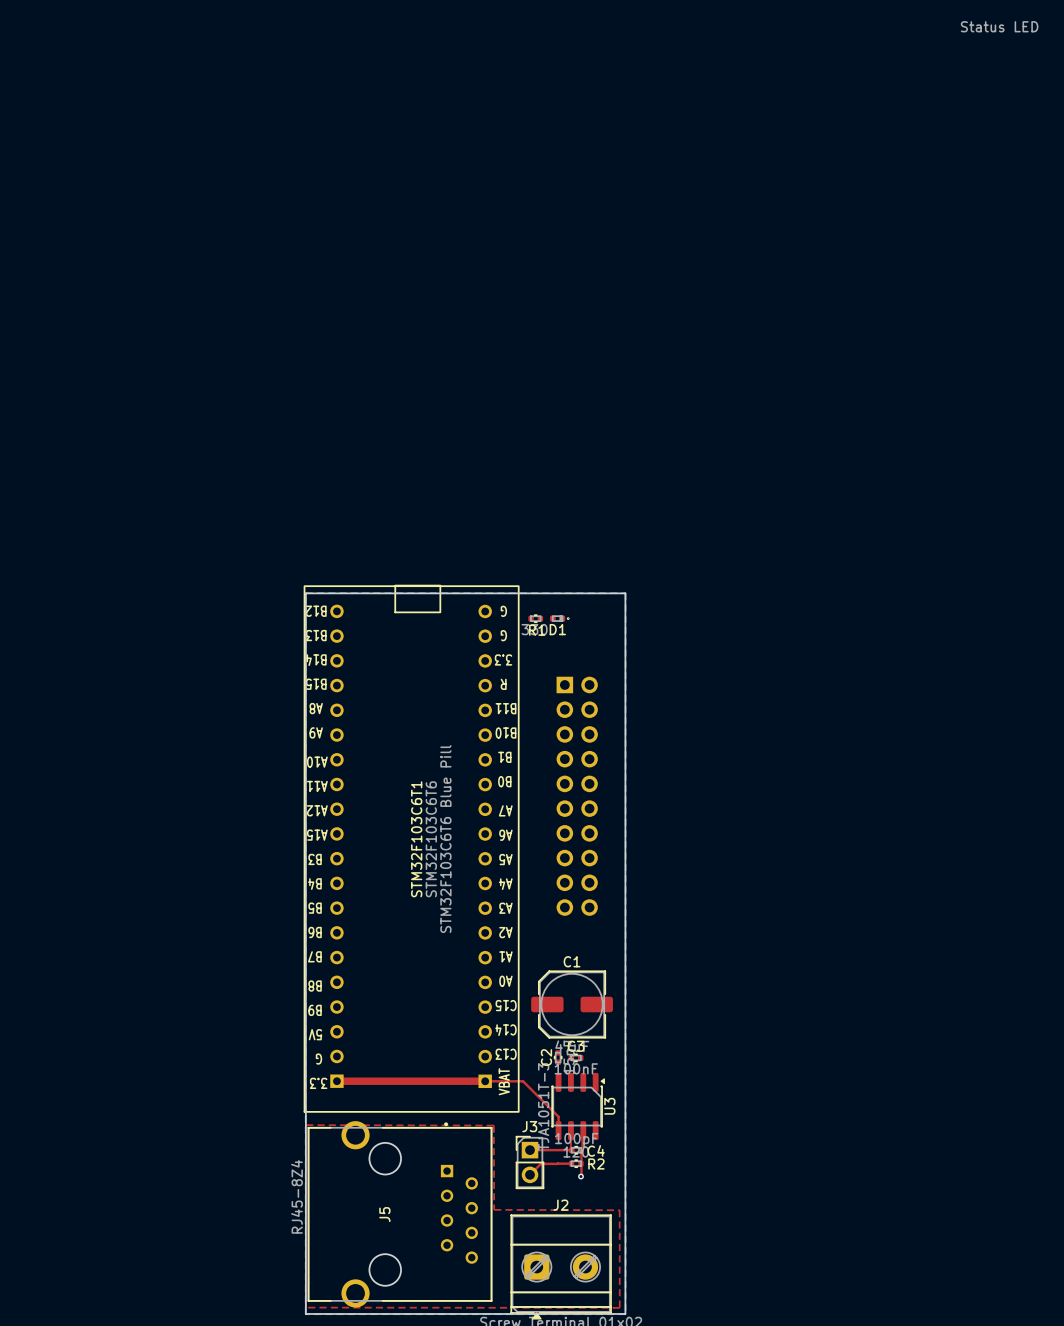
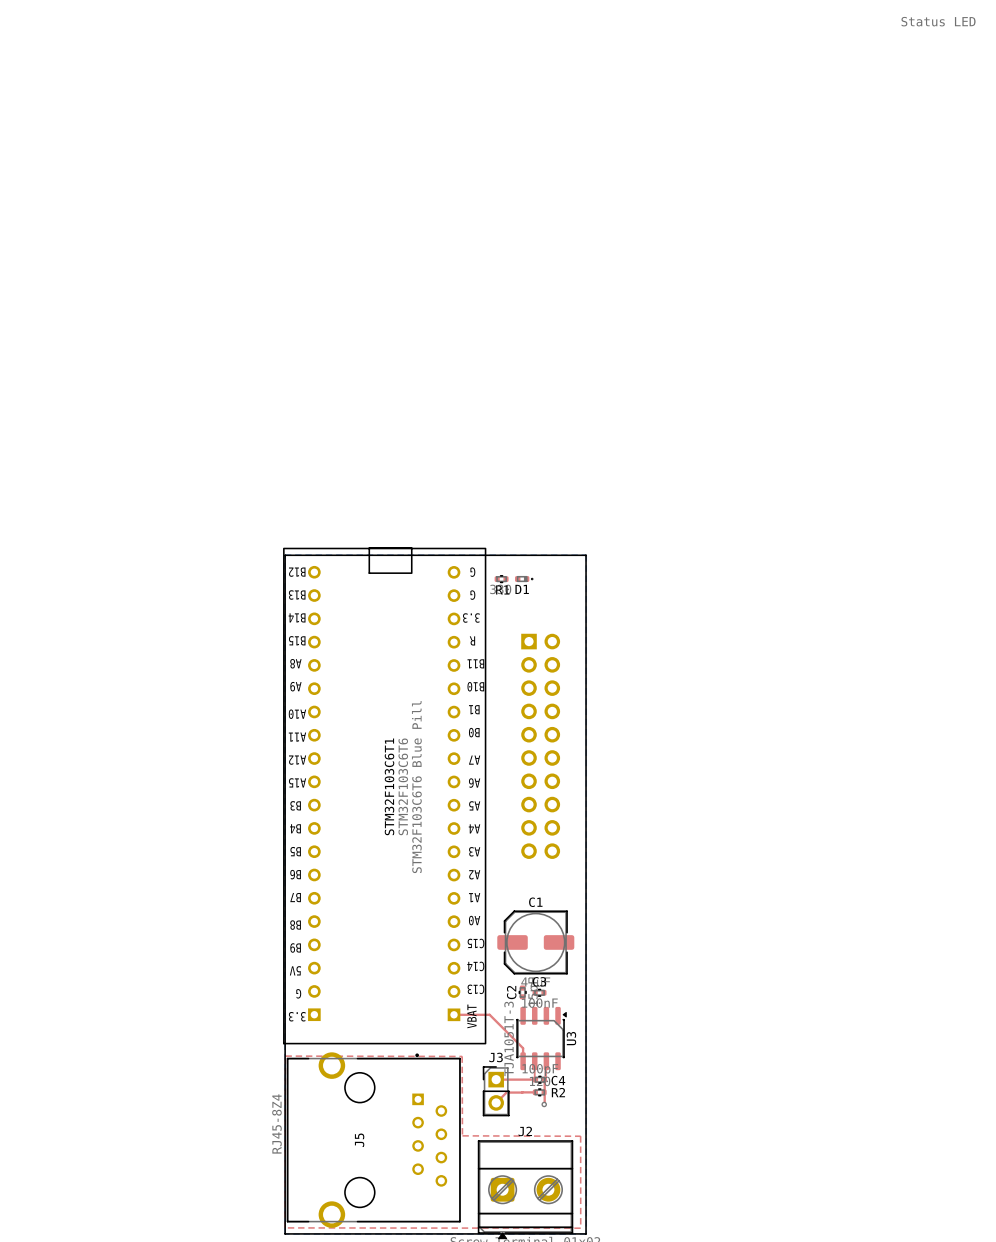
top track: (336, 1081) (485, 1081) -> none

